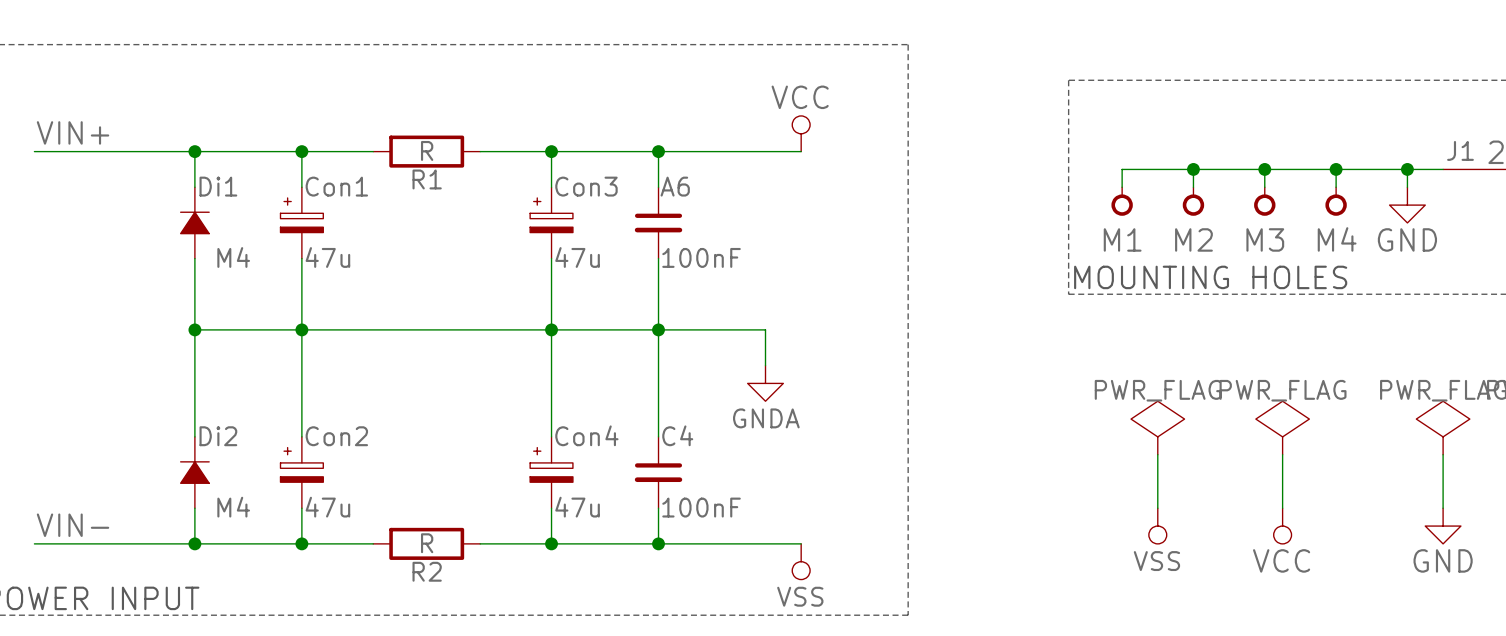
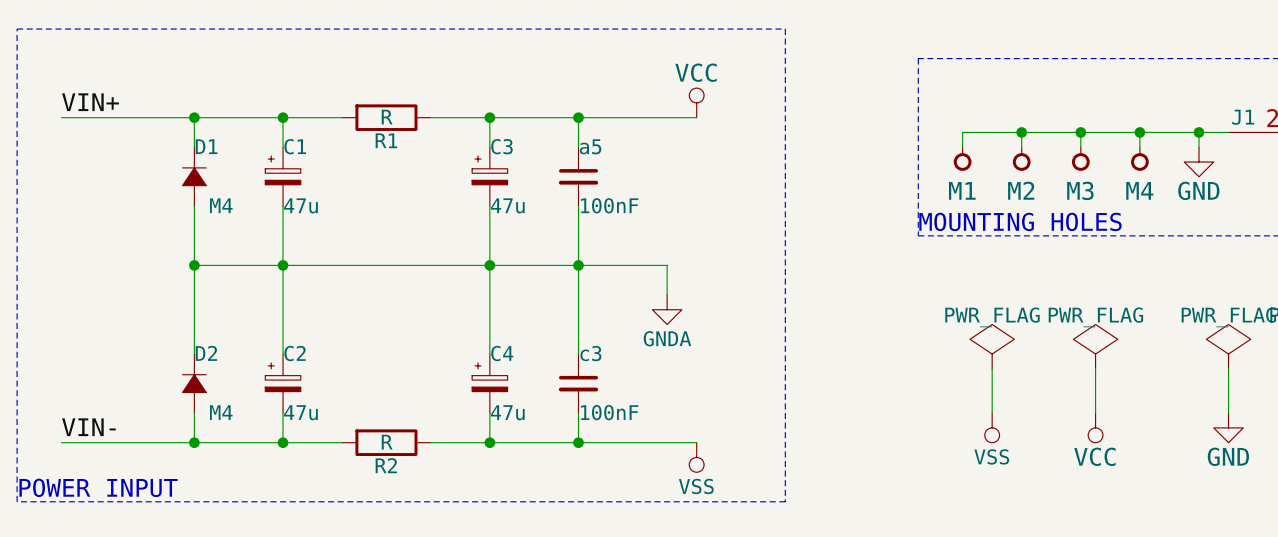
Di1 name: Di1 (218, 186) -> D1 (206, 146)
Con1 name: Con1 (336, 186) -> C1 (295, 146)
Con3 name: Con3 (586, 186) -> C3 (501, 146)
A6 name: A6 (675, 186) -> a5 (590, 146)
Con4 name: Con4 (586, 435) -> C4 (502, 353)
C4 name: C4 (677, 435) -> c3 (590, 353)
Di2 name: Di2 (218, 436) -> D2 (206, 353)
Con2 name: Con2 (336, 436) -> C2 (295, 353)

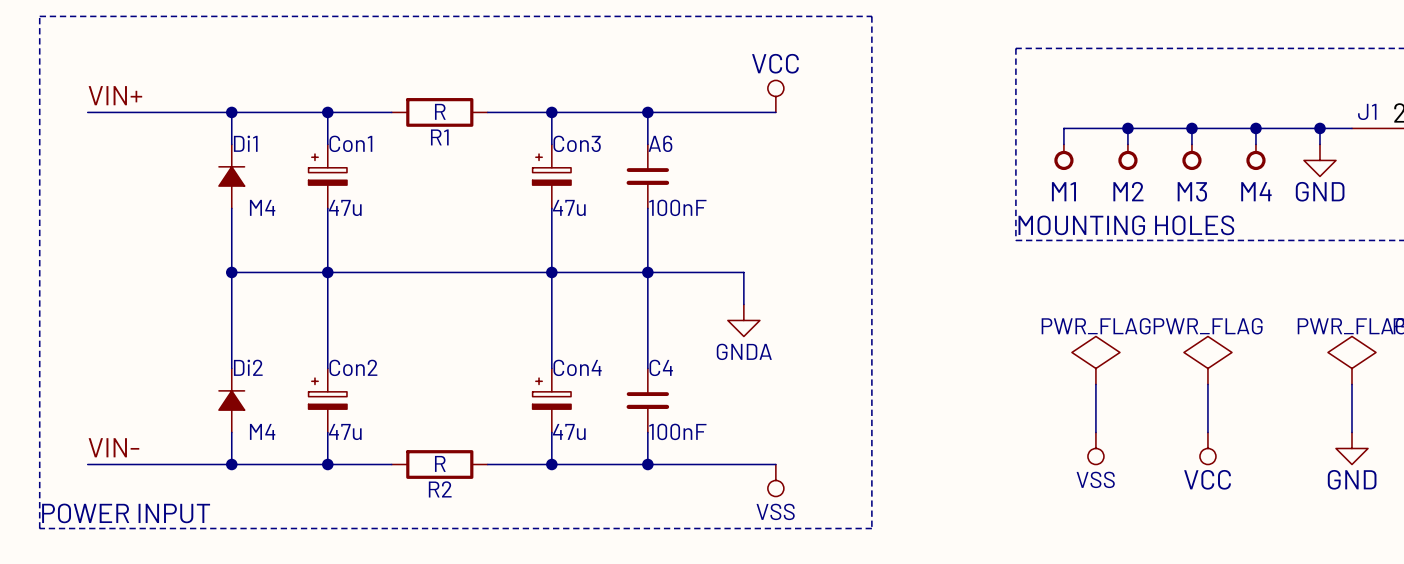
D1 name: D1 (206, 146) -> Di1 (245, 143)
C1 name: C1 (295, 146) -> Con1 (350, 143)
C3 name: C3 (501, 146) -> Con3 (577, 143)
a5 name: a5 (590, 146) -> A6 (660, 143)
D2 name: D2 (206, 353) -> Di2 (248, 367)
C2 name: C2 (295, 353) -> Con2 (353, 367)
C4 name: C4 (502, 353) -> Con4 (577, 367)
c3 name: c3 (590, 353) -> C4 (661, 367)

